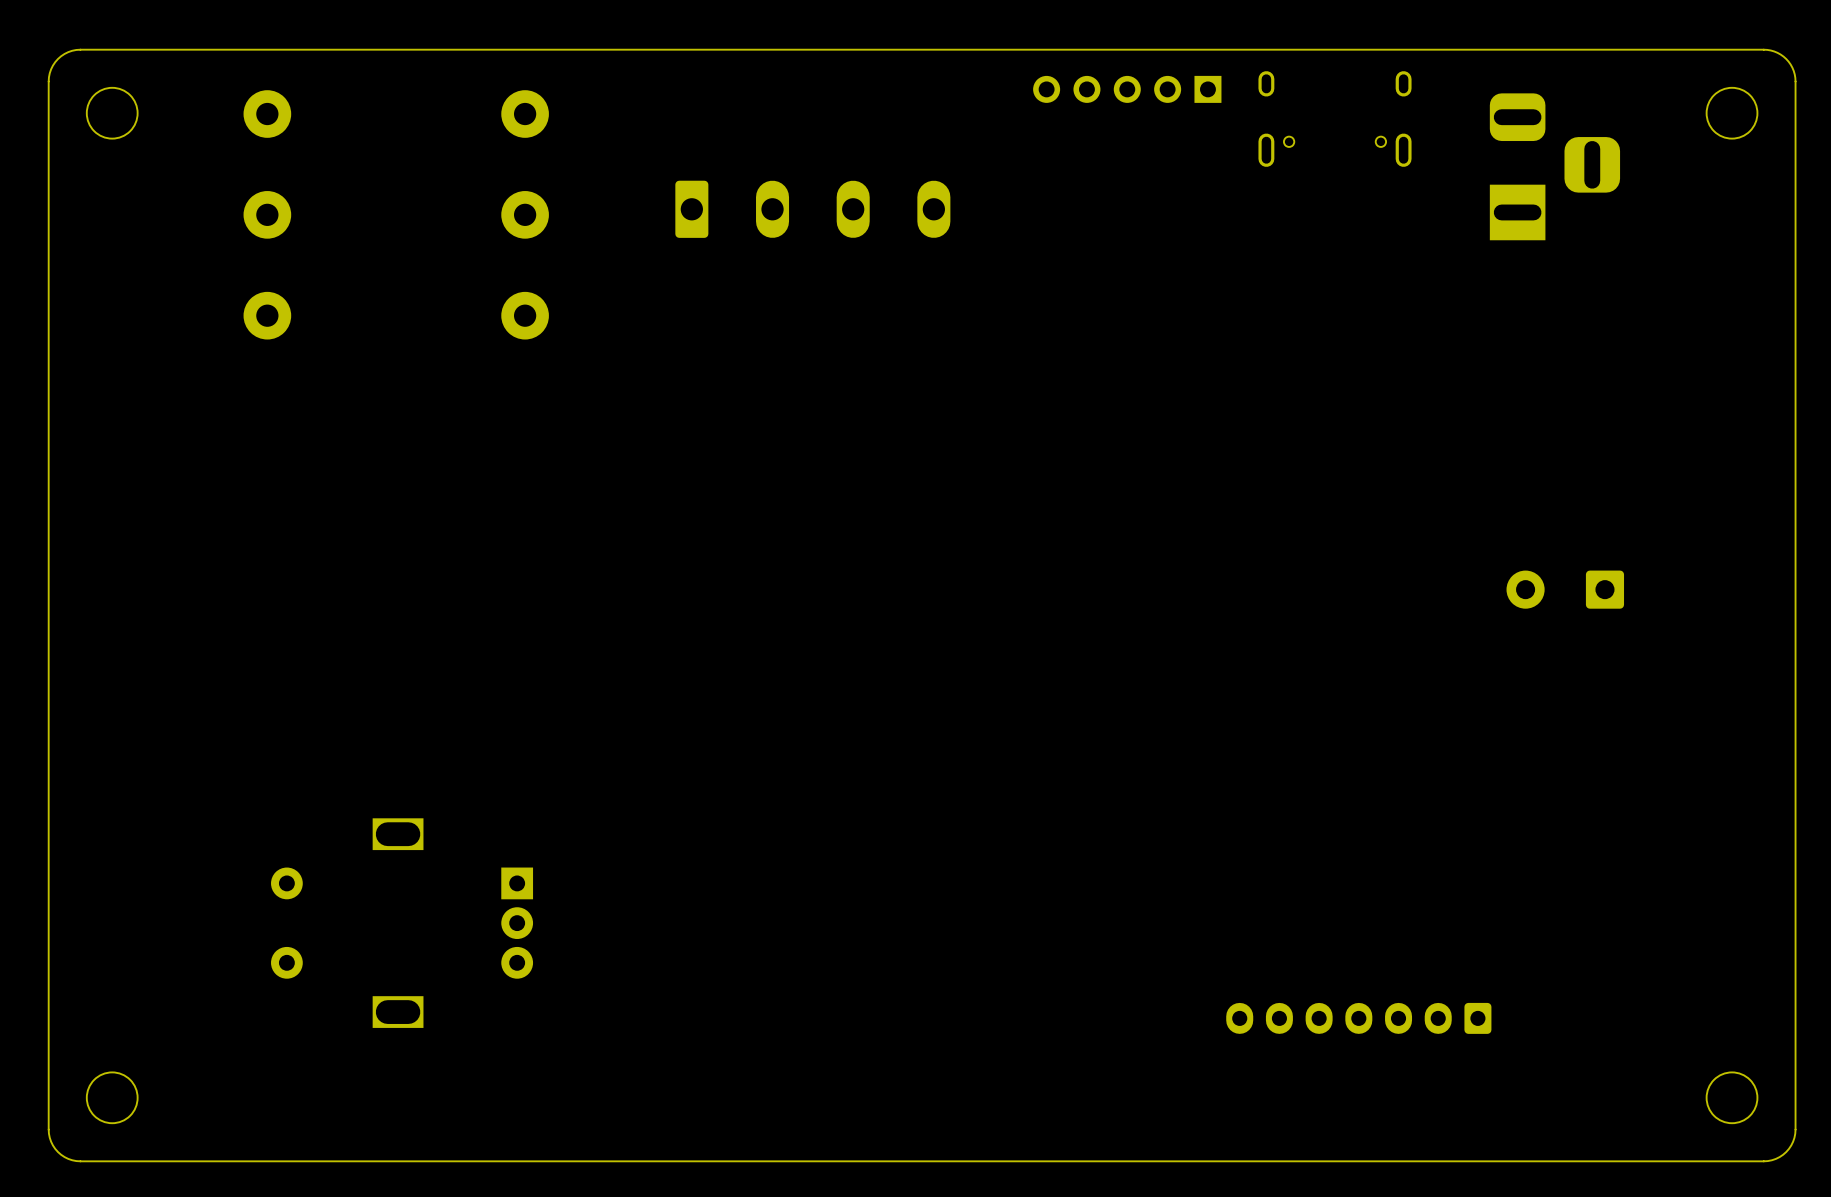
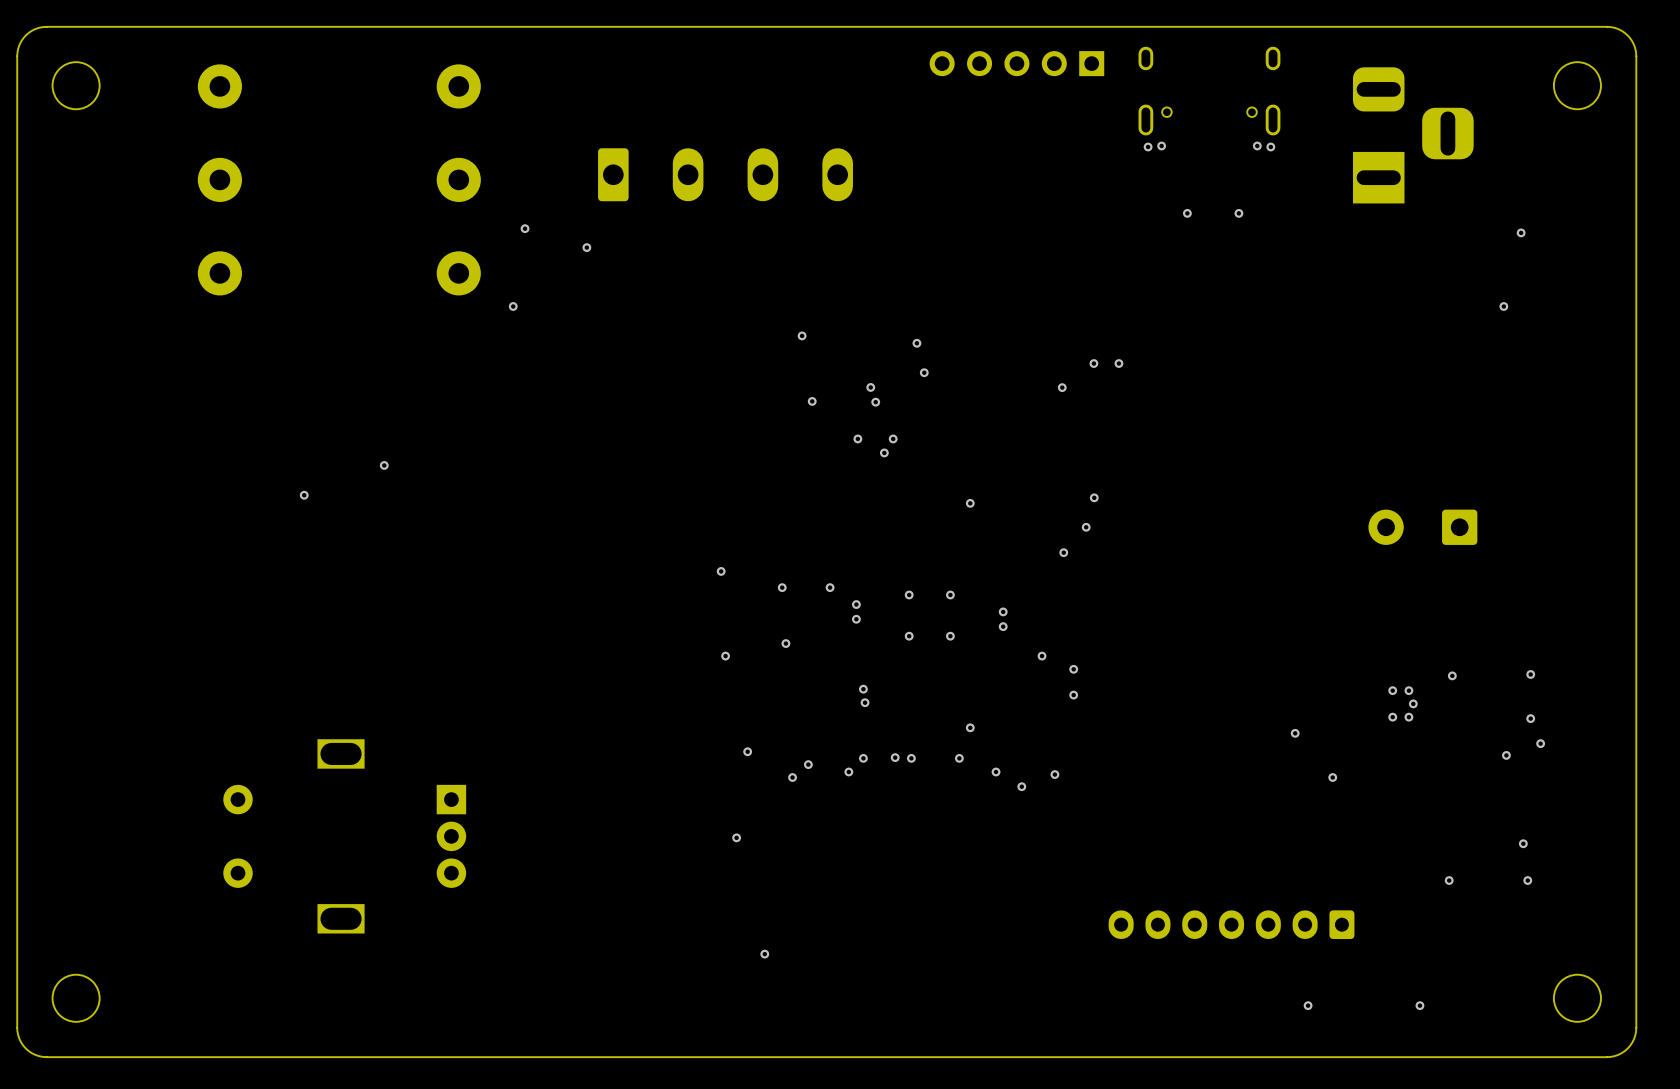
via: none -> (1161, 145)
via: none -> (1257, 145)
via: none -> (1148, 146)
via: none -> (1270, 146)
via: none -> (1187, 213)
via: none -> (1238, 213)
via: none -> (525, 228)
via: none -> (1521, 232)
via: none -> (586, 247)
via: none -> (513, 306)
via: none -> (1503, 306)
via: none -> (802, 335)
via: none -> (916, 343)
via: none -> (1093, 363)
via: none -> (1118, 363)
via: none -> (924, 372)
via: none -> (870, 387)
via: none -> (1062, 387)
via: none -> (812, 401)
via: none -> (875, 402)
via: none -> (857, 438)
via: none -> (893, 438)
via: none -> (884, 452)
via: none -> (384, 465)
via: none -> (304, 495)
via: none -> (1094, 497)
via: none -> (970, 503)
via: none -> (1086, 527)
via: none -> (1063, 552)
via: none -> (721, 571)
via: none -> (782, 587)
via: none -> (830, 587)
via: none -> (909, 594)
via: none -> (950, 594)
via: none -> (856, 604)
via: none -> (1003, 611)
via: none -> (856, 619)
via: none -> (1003, 626)
via: none -> (909, 636)
via: none -> (950, 636)
via: none -> (785, 643)
via: none -> (725, 656)
via: none -> (1042, 656)
via: none -> (1073, 669)
via: none -> (1530, 674)
via: none -> (1452, 675)
via: none -> (863, 689)
via: none -> (1392, 690)
via: none -> (1408, 690)
via: none -> (1073, 695)
via: none -> (865, 702)
via: none -> (1413, 703)
via: none -> (1392, 717)
via: none -> (1408, 717)
via: none -> (1530, 718)
via: none -> (970, 727)
via: none -> (1295, 733)
via: none -> (1540, 743)
via: none -> (747, 751)
via: none -> (1506, 755)
via: none -> (863, 758)
via: none -> (895, 757)
via: none -> (911, 758)
via: none -> (959, 758)
via: none -> (808, 764)
via: none -> (848, 771)
via: none -> (996, 771)
via: none -> (1054, 774)
via: none -> (792, 777)
via: none -> (1332, 777)
via: none -> (1021, 786)
via: none -> (736, 837)
via: none -> (1523, 843)
via: none -> (1449, 880)
via: none -> (1527, 880)
via: none -> (764, 954)
via: none -> (1308, 1005)
via: none -> (1419, 1005)

